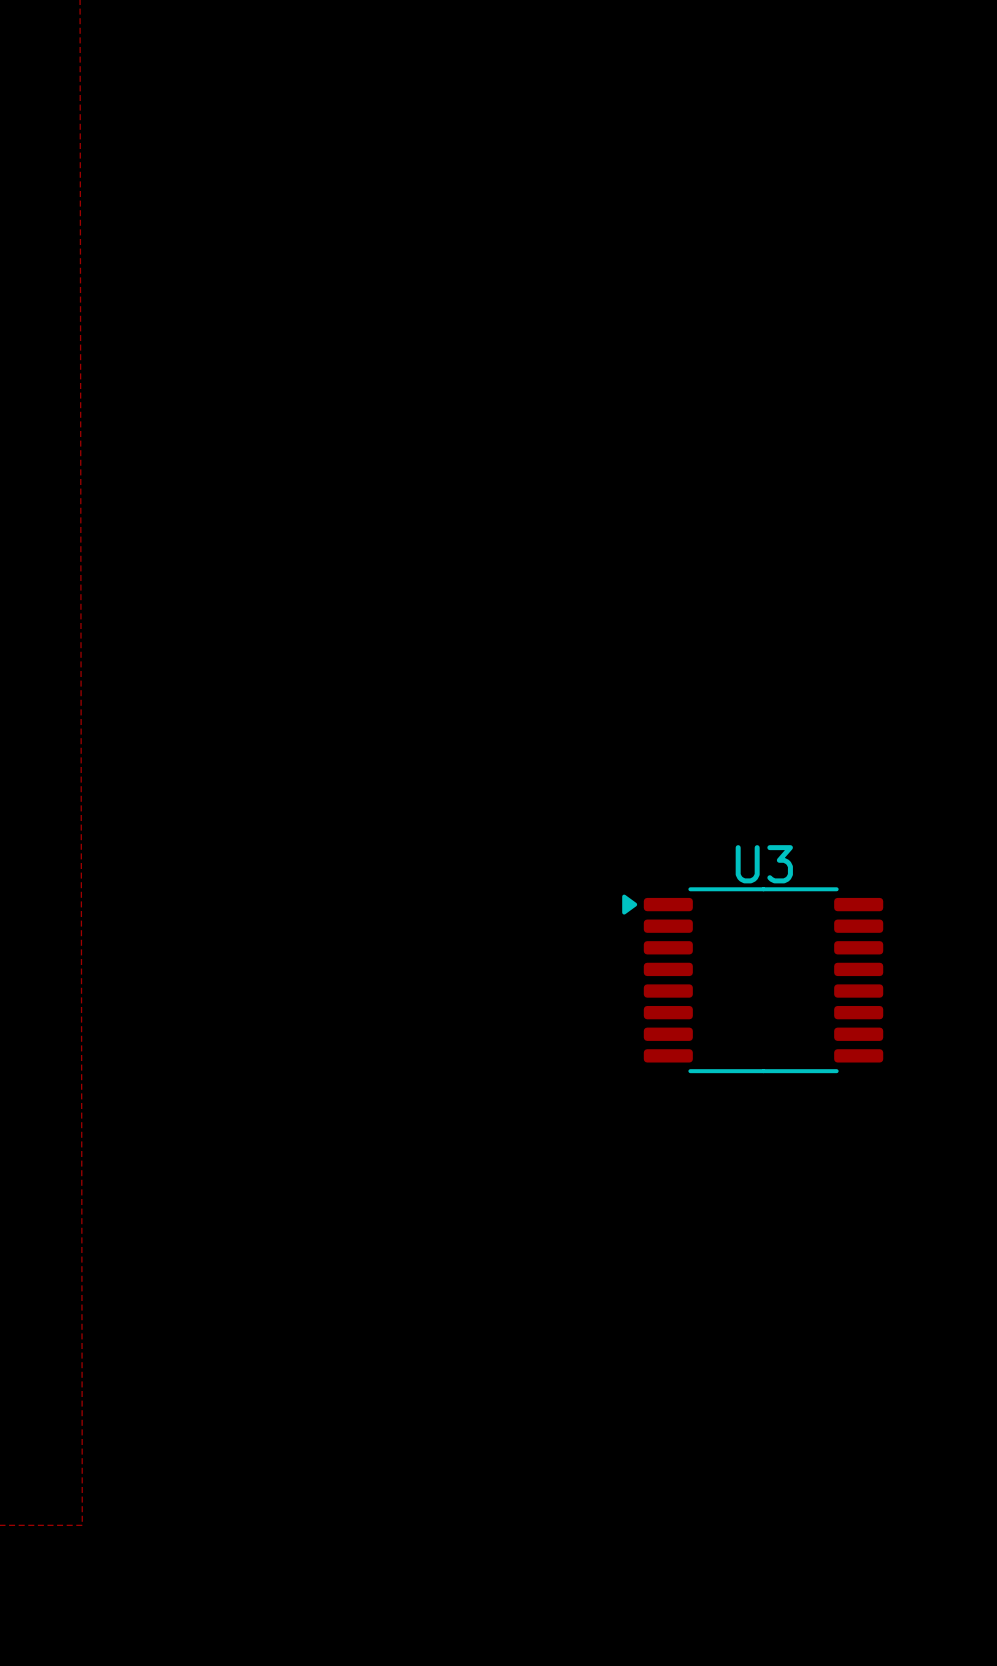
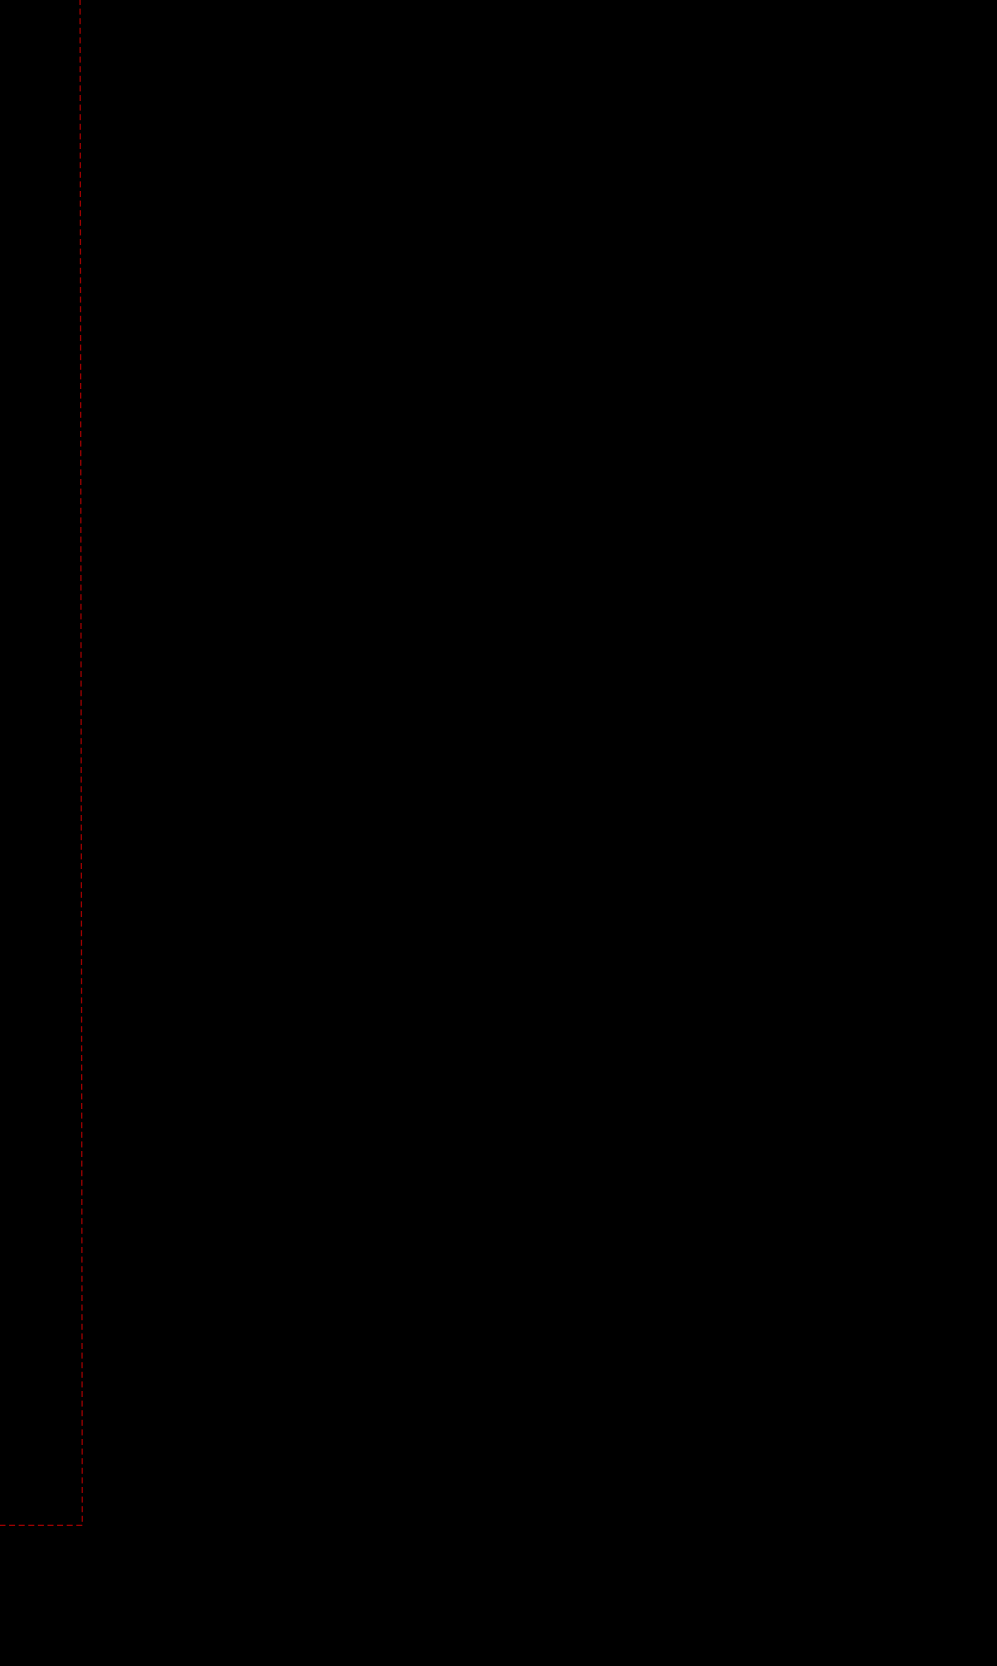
U3: (752, 980) -> none

